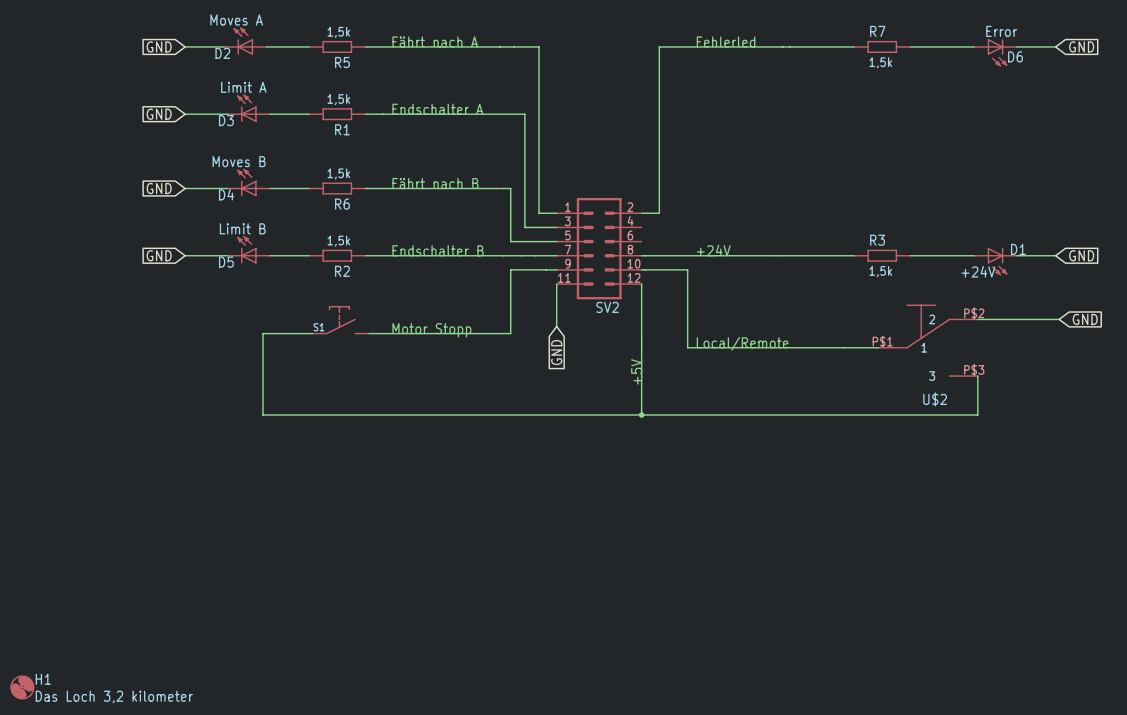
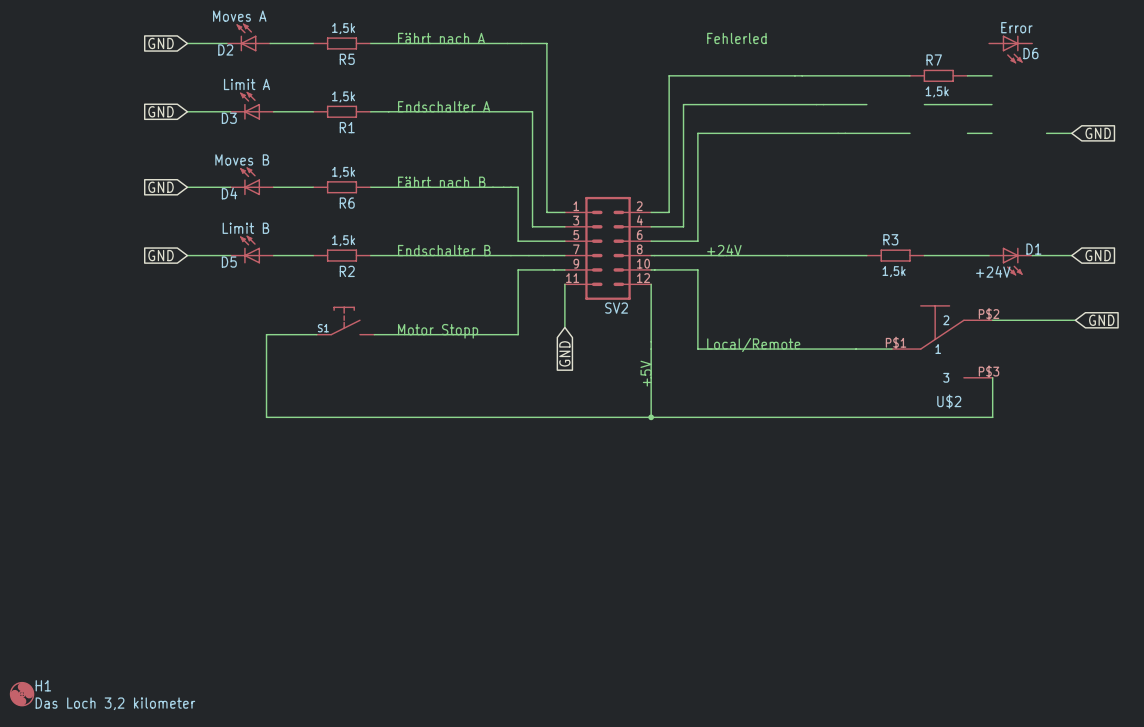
wire: (853, 46) (659, 46) (659, 78) -> (909, 75) (669, 75)
R7 position: (882, 46) -> (938, 75)
wire: (910, 46) (974, 46) -> none
wire: (1016, 46) (1055, 46) -> none
global label position: GND (1081, 46) -> GND (1098, 133)
wire: none -> (967, 75) (991, 75)
wire: none -> (866, 104) (683, 104) (683, 226) (651, 226)
wire: none -> (924, 104) (991, 104)
wire: none -> (909, 133) (697, 133) (697, 241) (651, 241)
wire: none -> (967, 133) (991, 133)
wire: none -> (1046, 133) (1071, 133)

